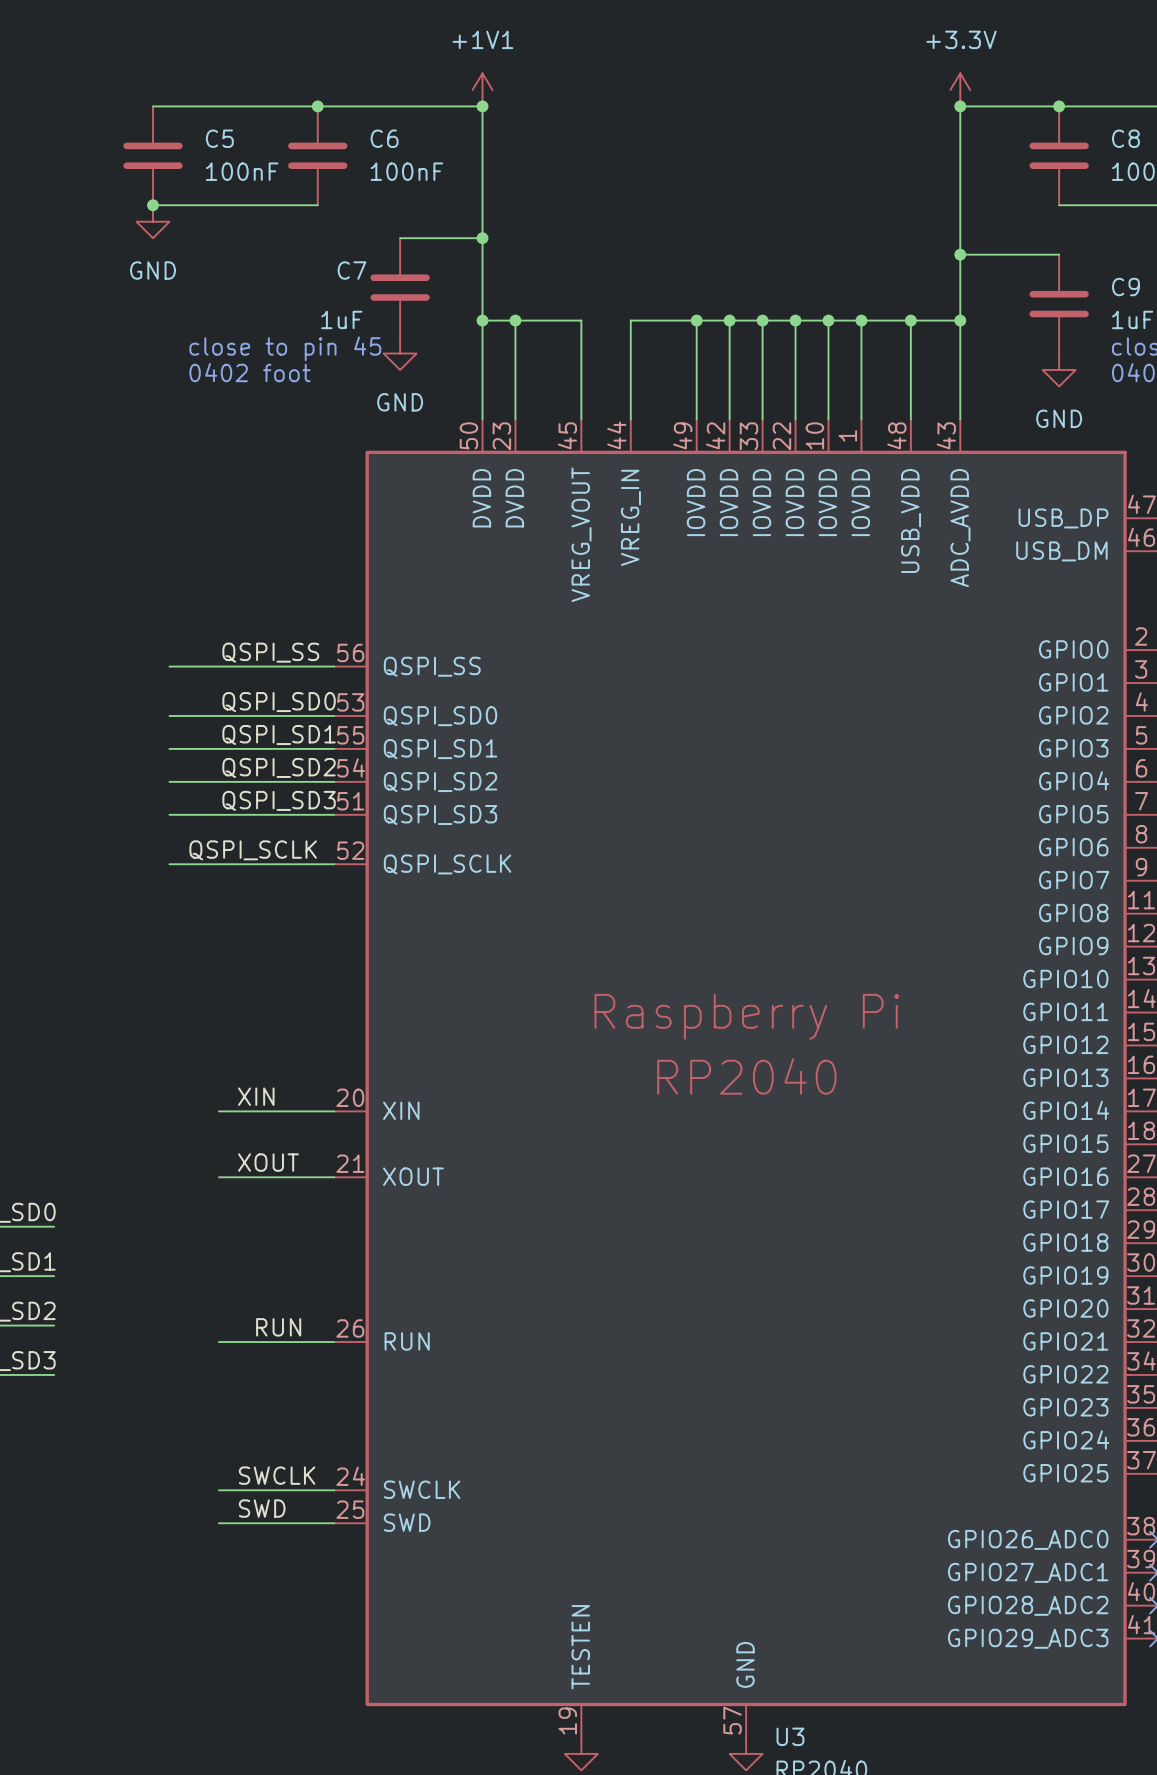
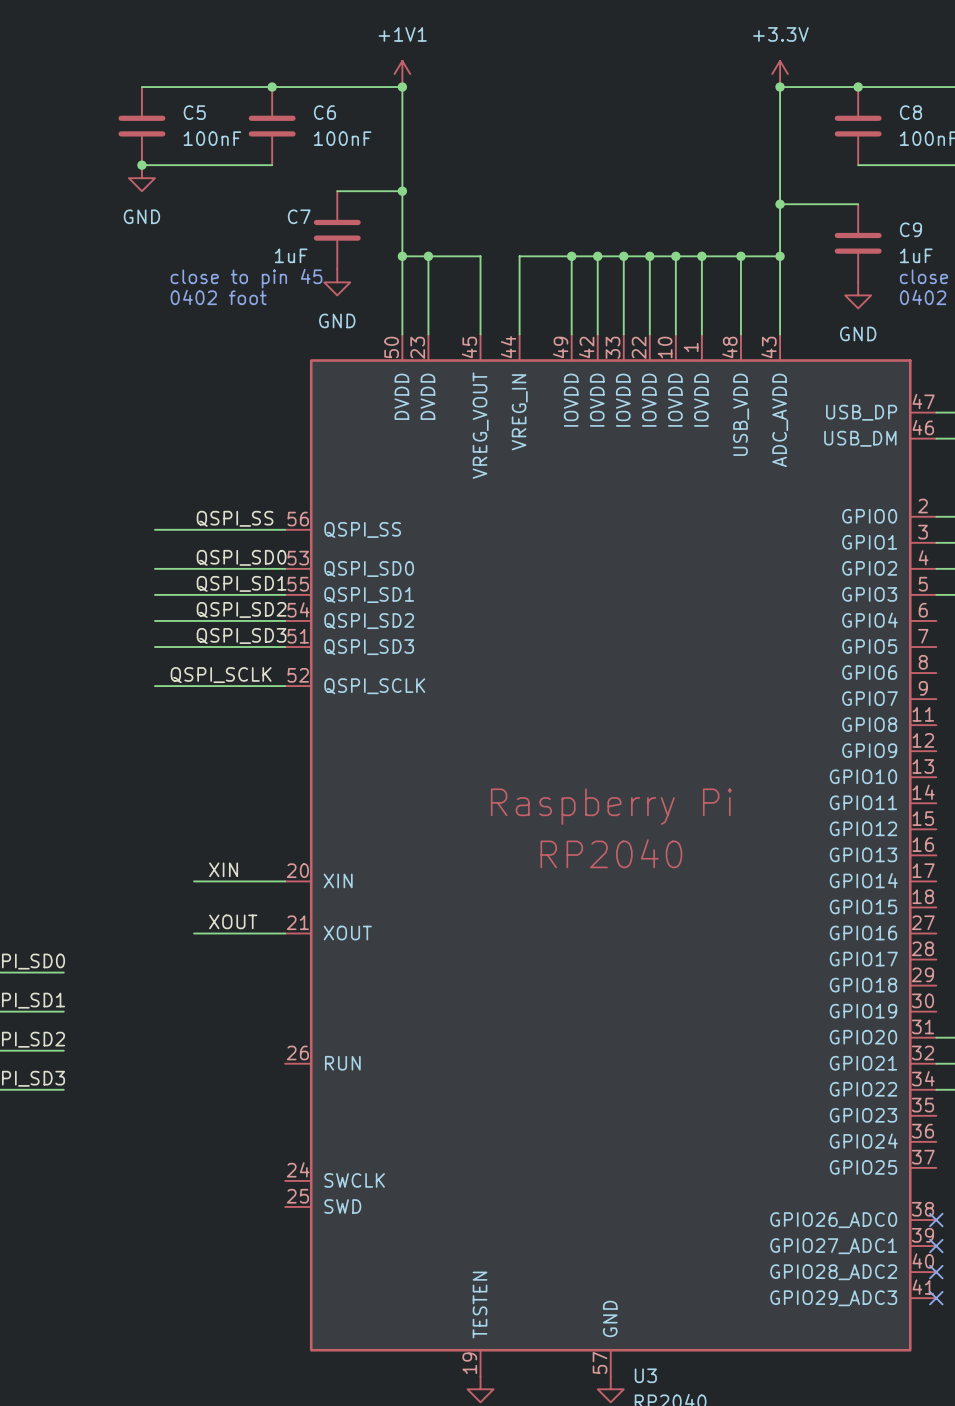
label: RUN (278, 1327) -> none
wire: (218, 1342) (334, 1342) -> none
label: SWCLK (277, 1475) -> none
wire: (218, 1490) (334, 1490) -> none
label: SWD (262, 1508) -> none
wire: (218, 1523) (334, 1523) -> none

